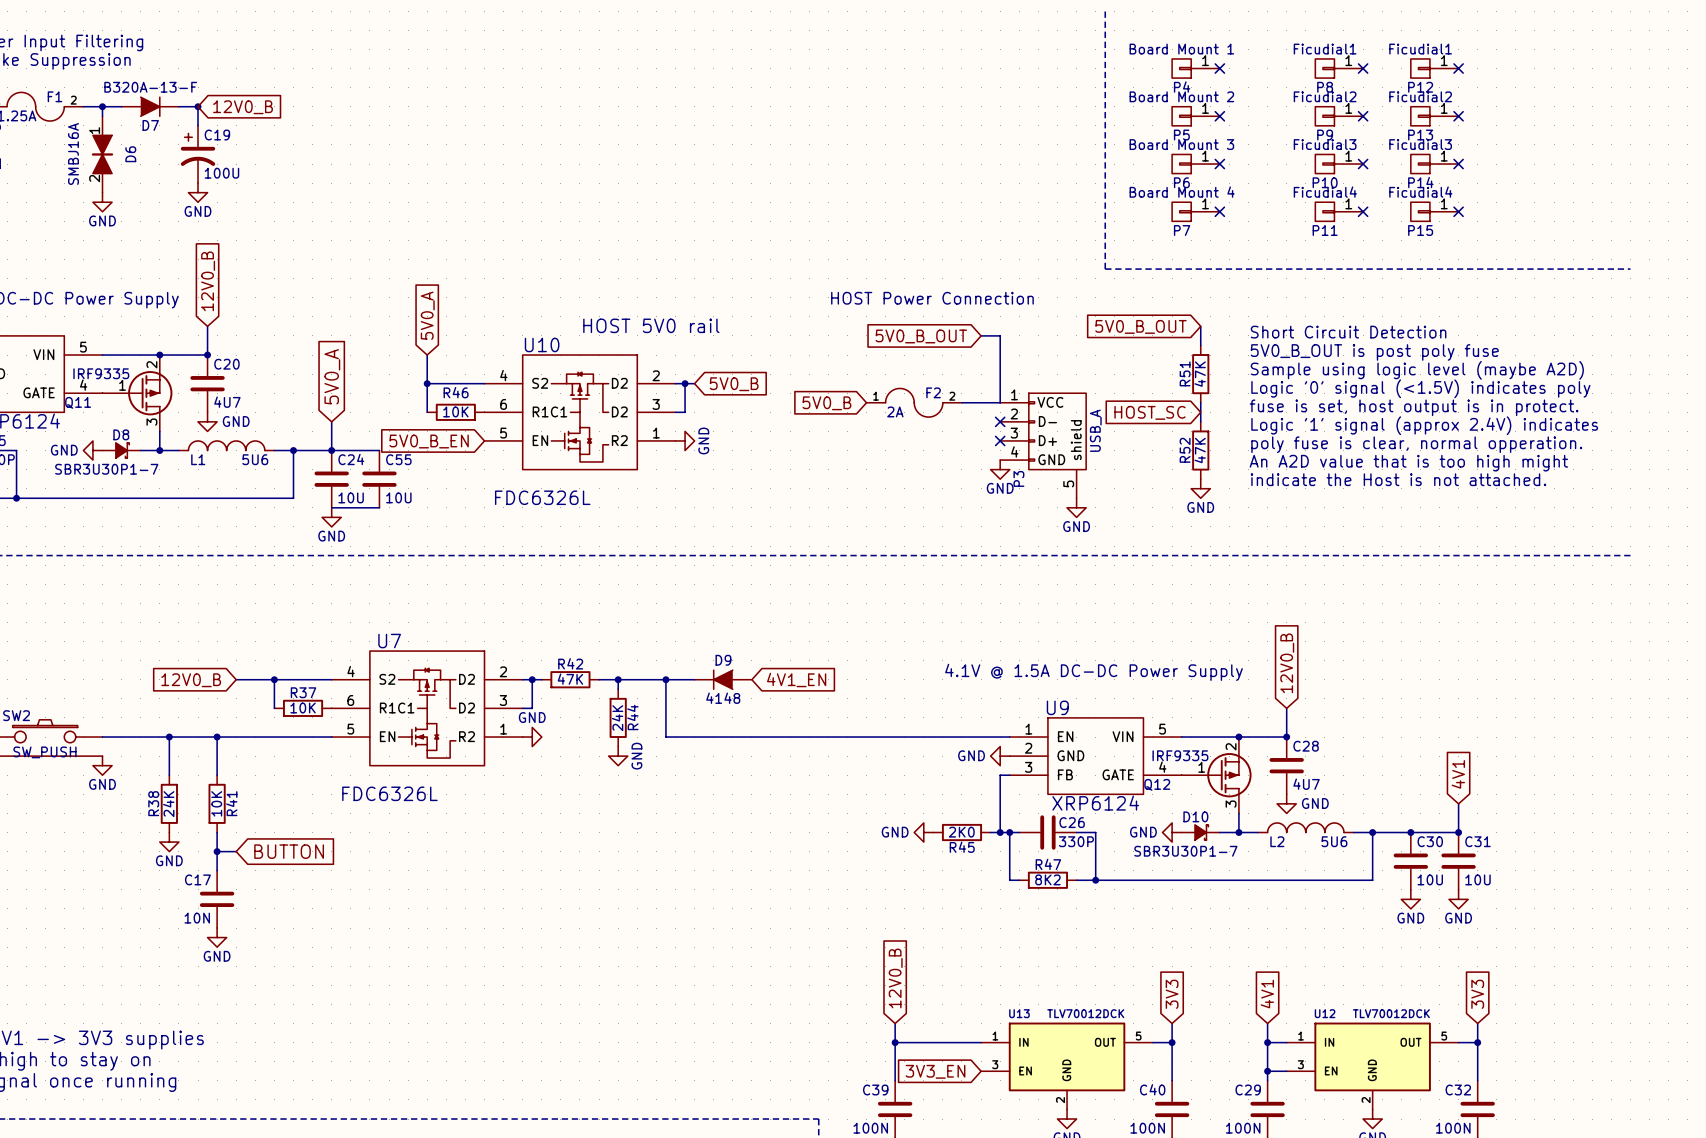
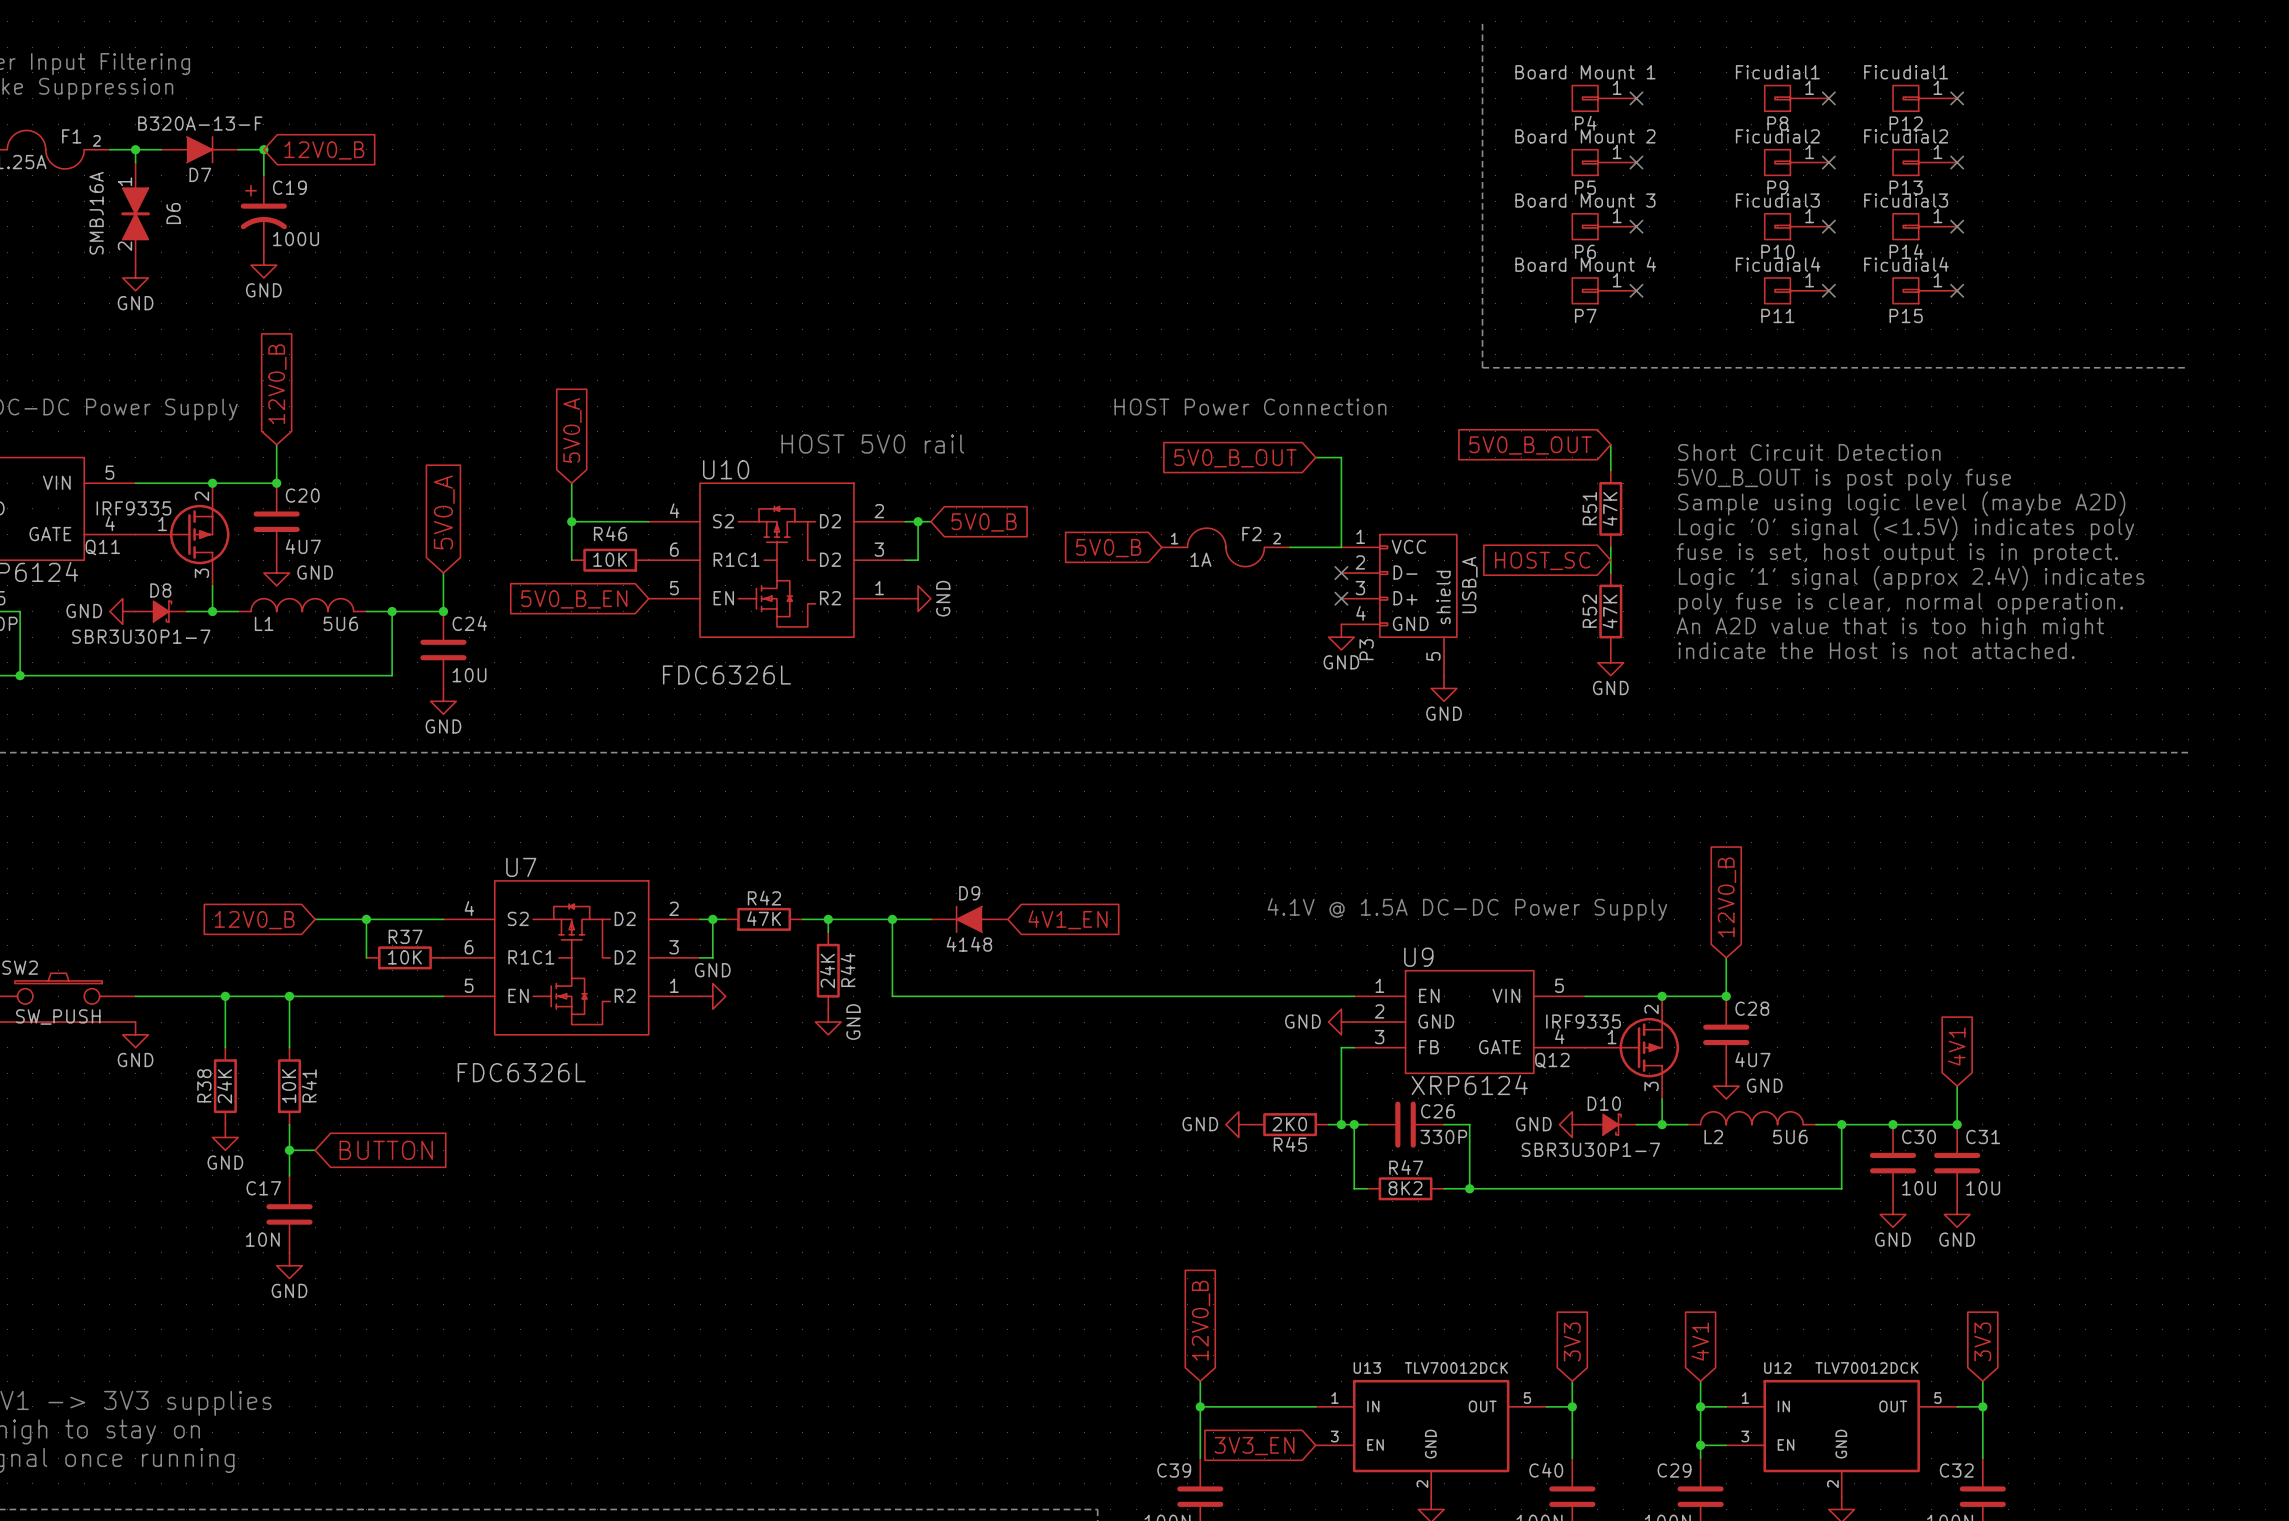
F2 value: 2A (895, 411) -> 1A (1200, 559)
wire: (331, 450) (379, 450) -> none
C55: 10U (379, 479) -> none
wire: (331, 507) (379, 507) -> none

